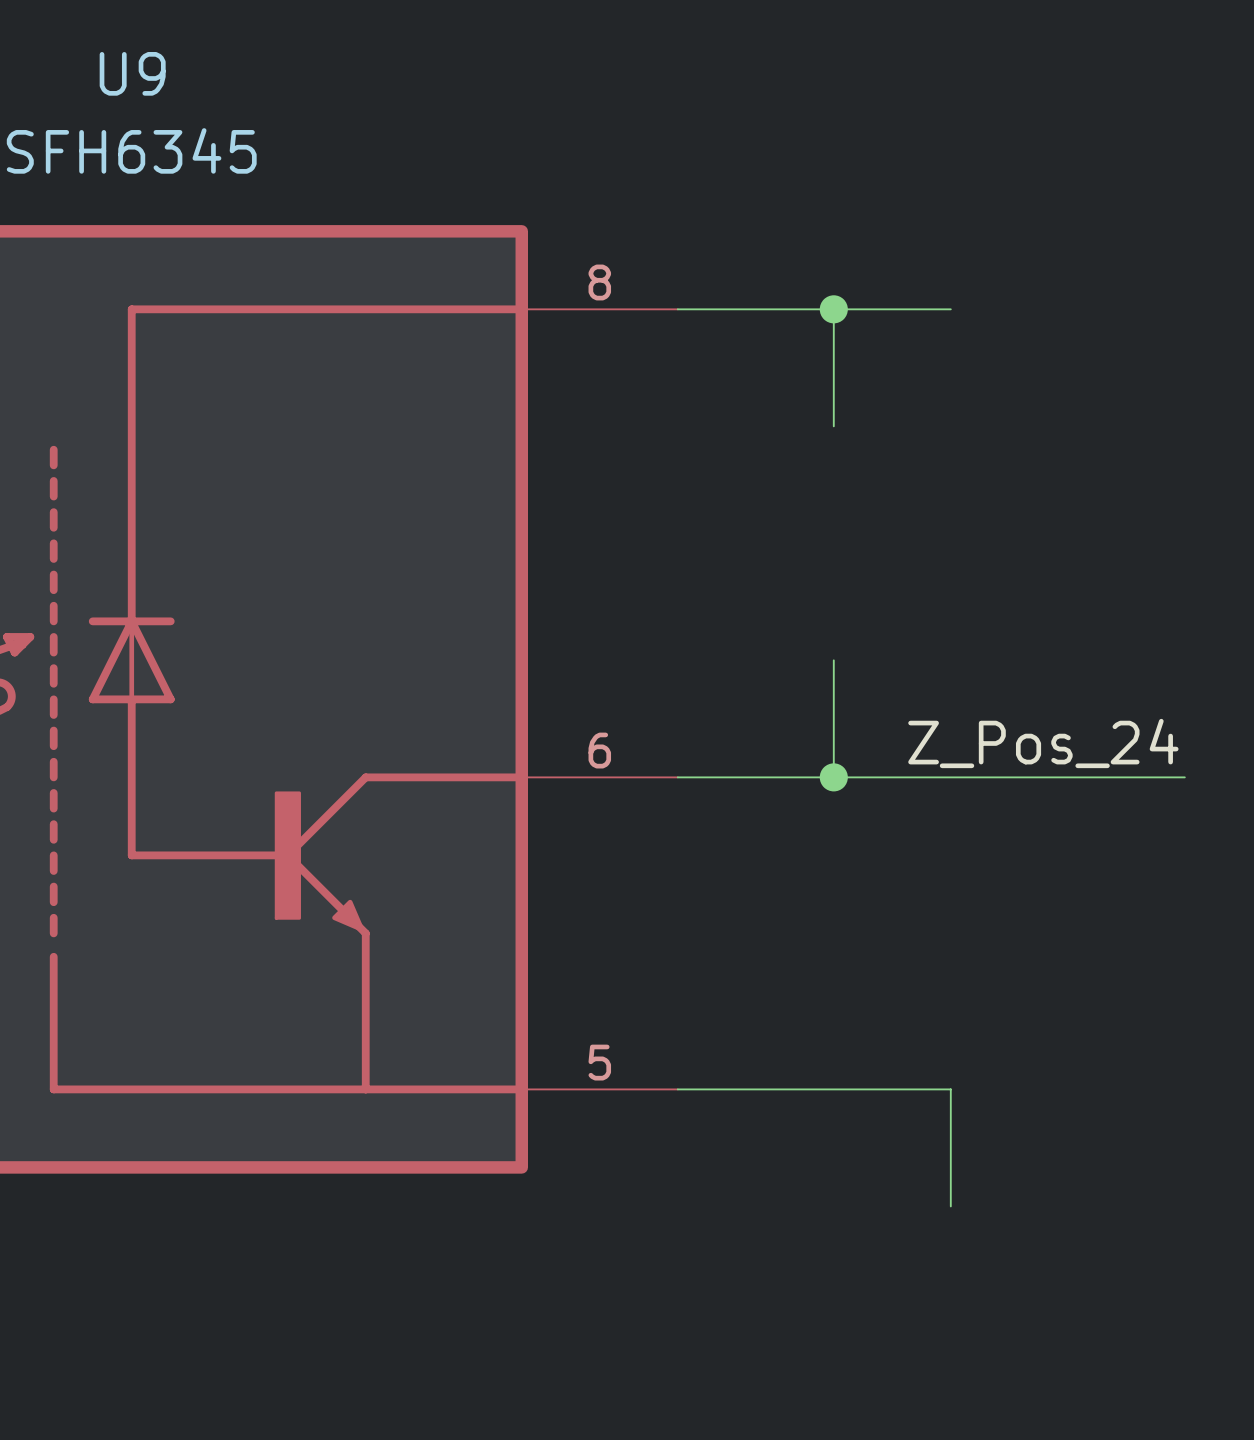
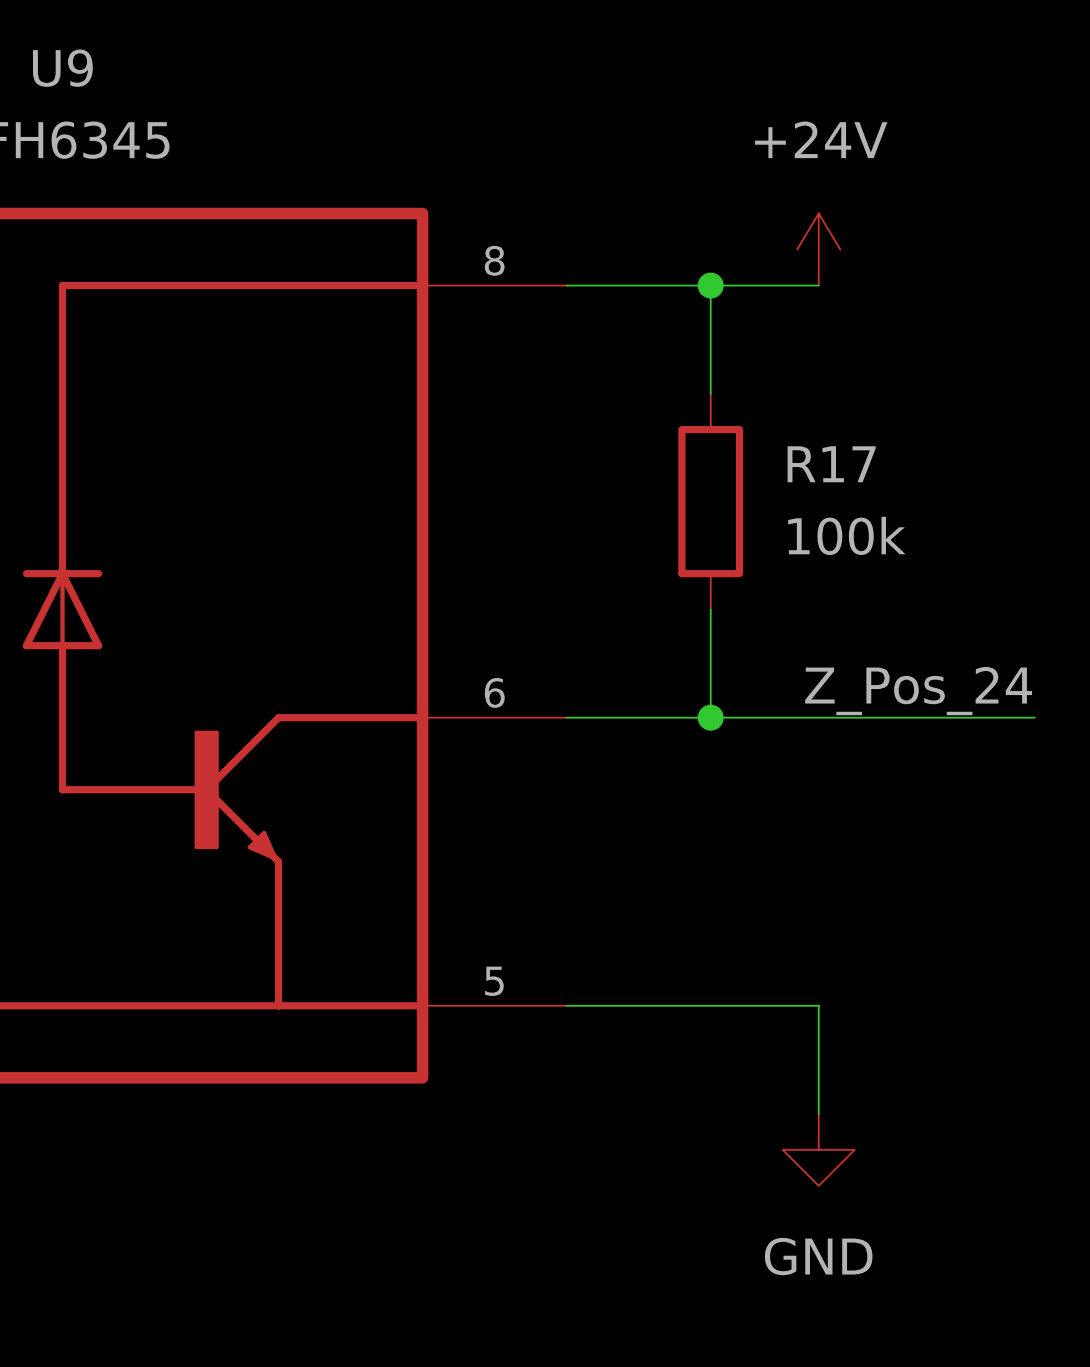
power symbol: none -> +24V (818, 249)
R17: none -> 100k (710, 501)
power symbol: none -> GND (818, 1149)

